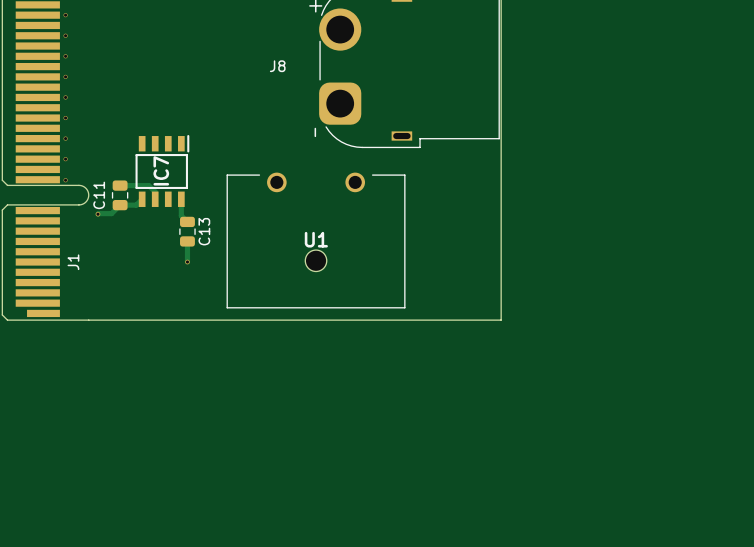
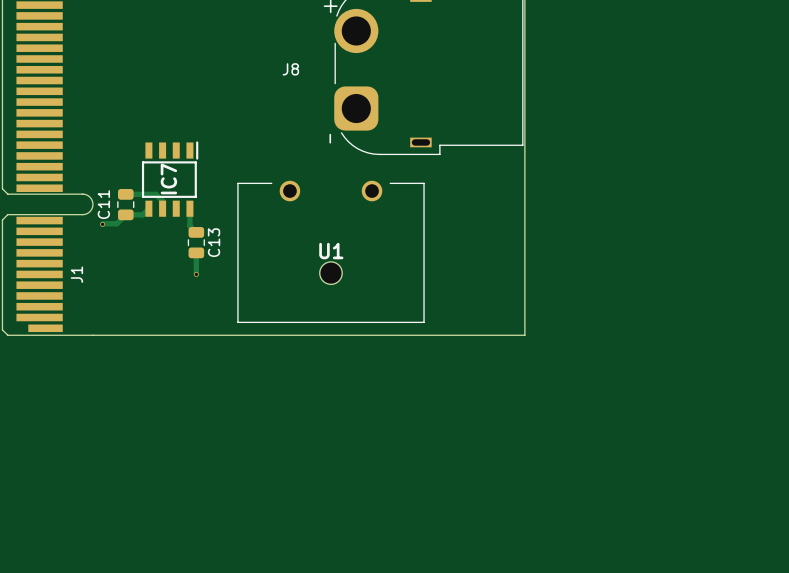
via: (65, 15) -> none
via: (65, 35) -> none
via: (65, 56) -> none
via: (65, 76) -> none
via: (65, 97) -> none
via: (65, 118) -> none
via: (65, 138) -> none
via: (65, 159) -> none
via: (65, 180) -> none

